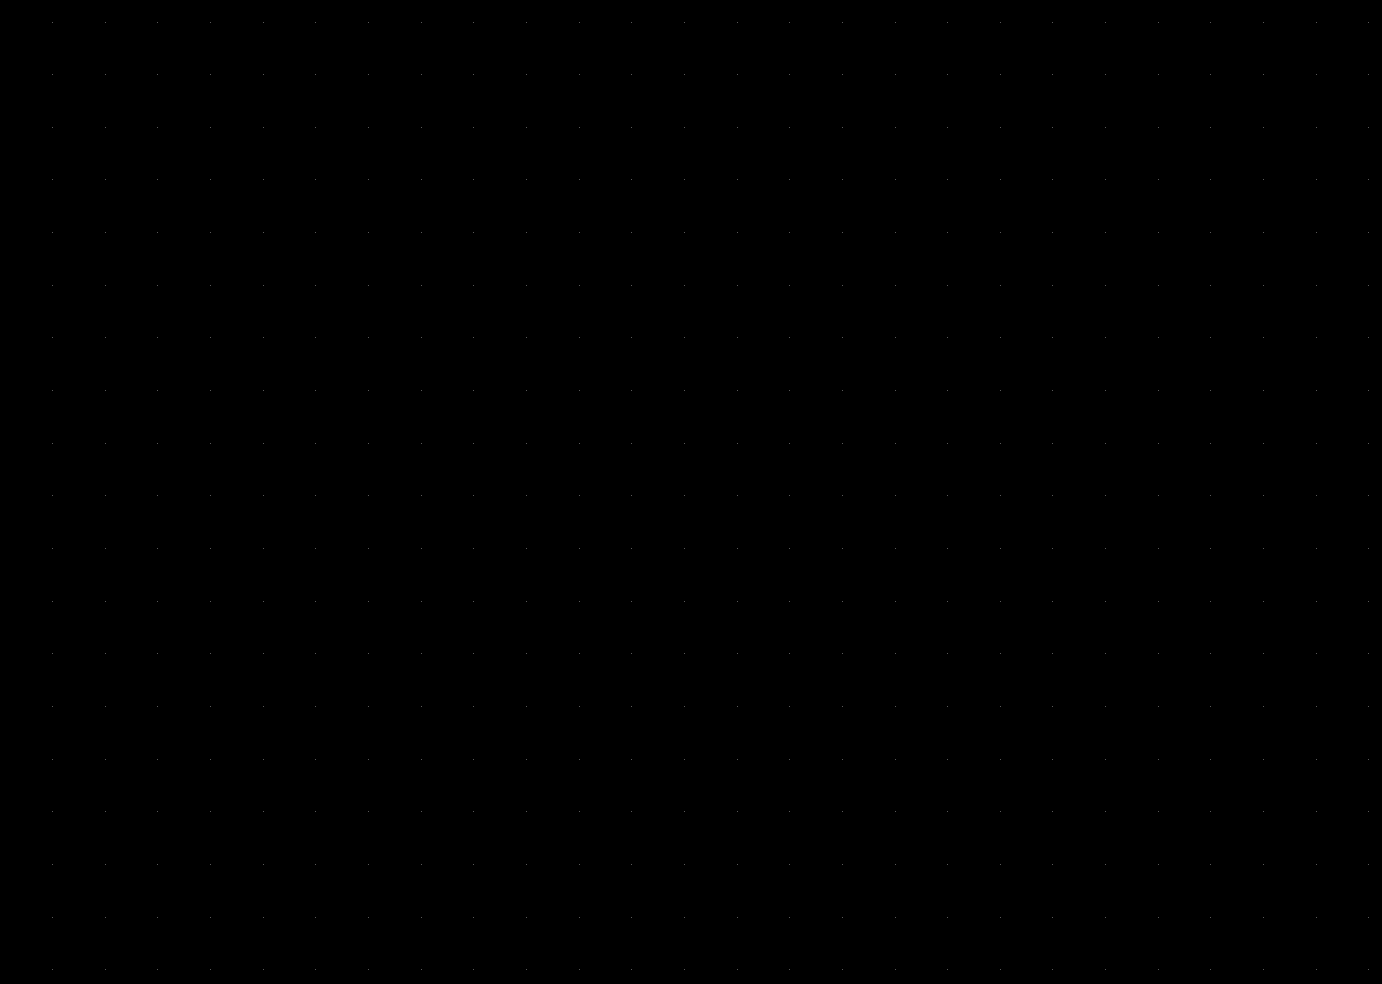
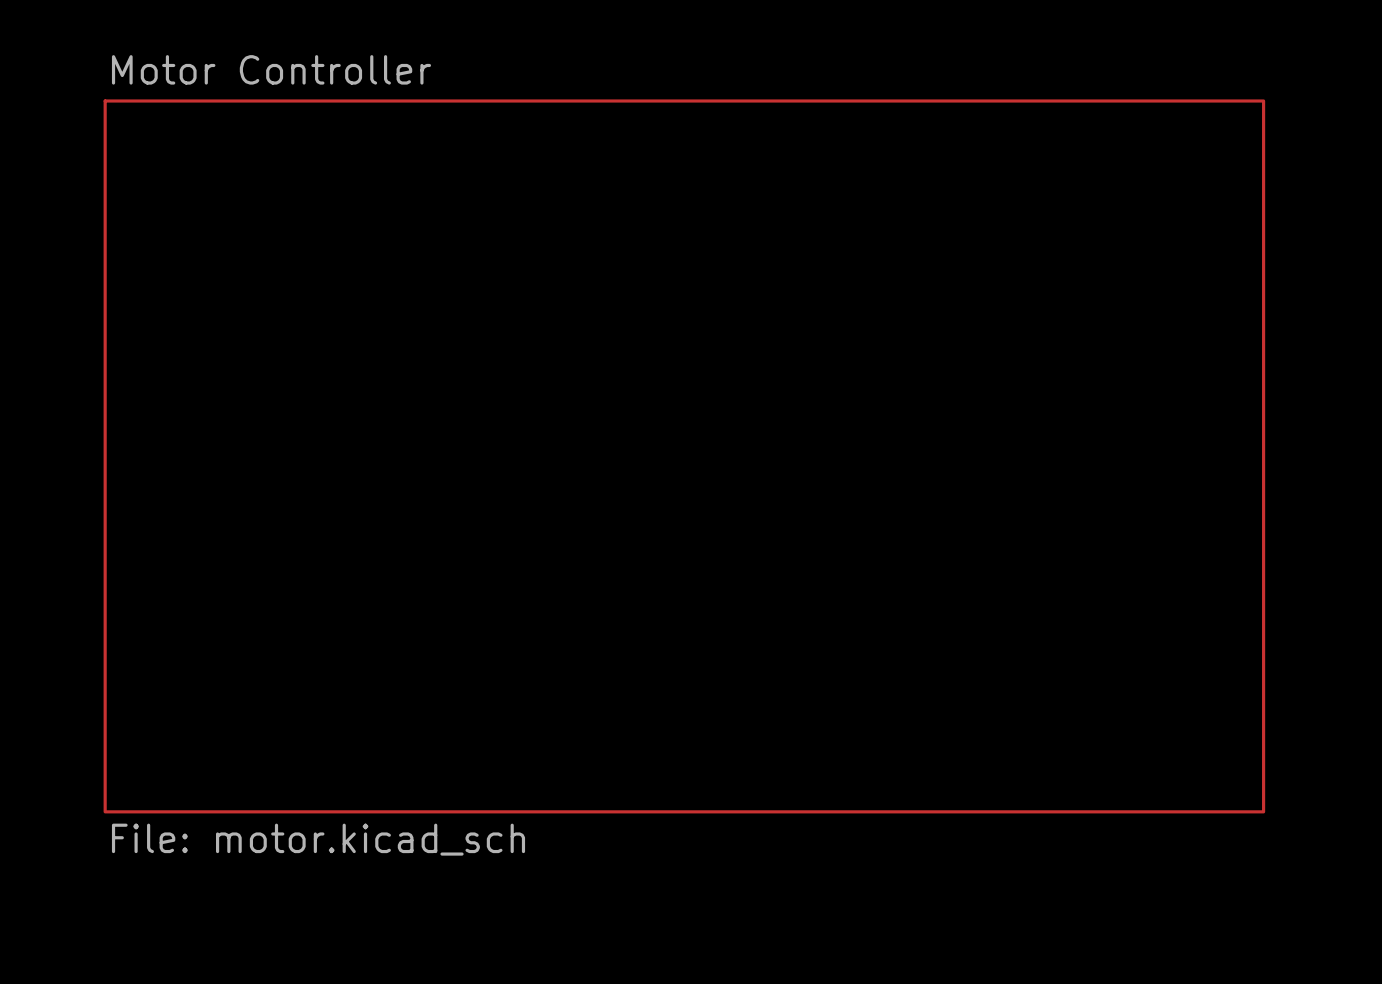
sheet Motor Controller: none -> File: motor.kicad_sch (684, 456)

